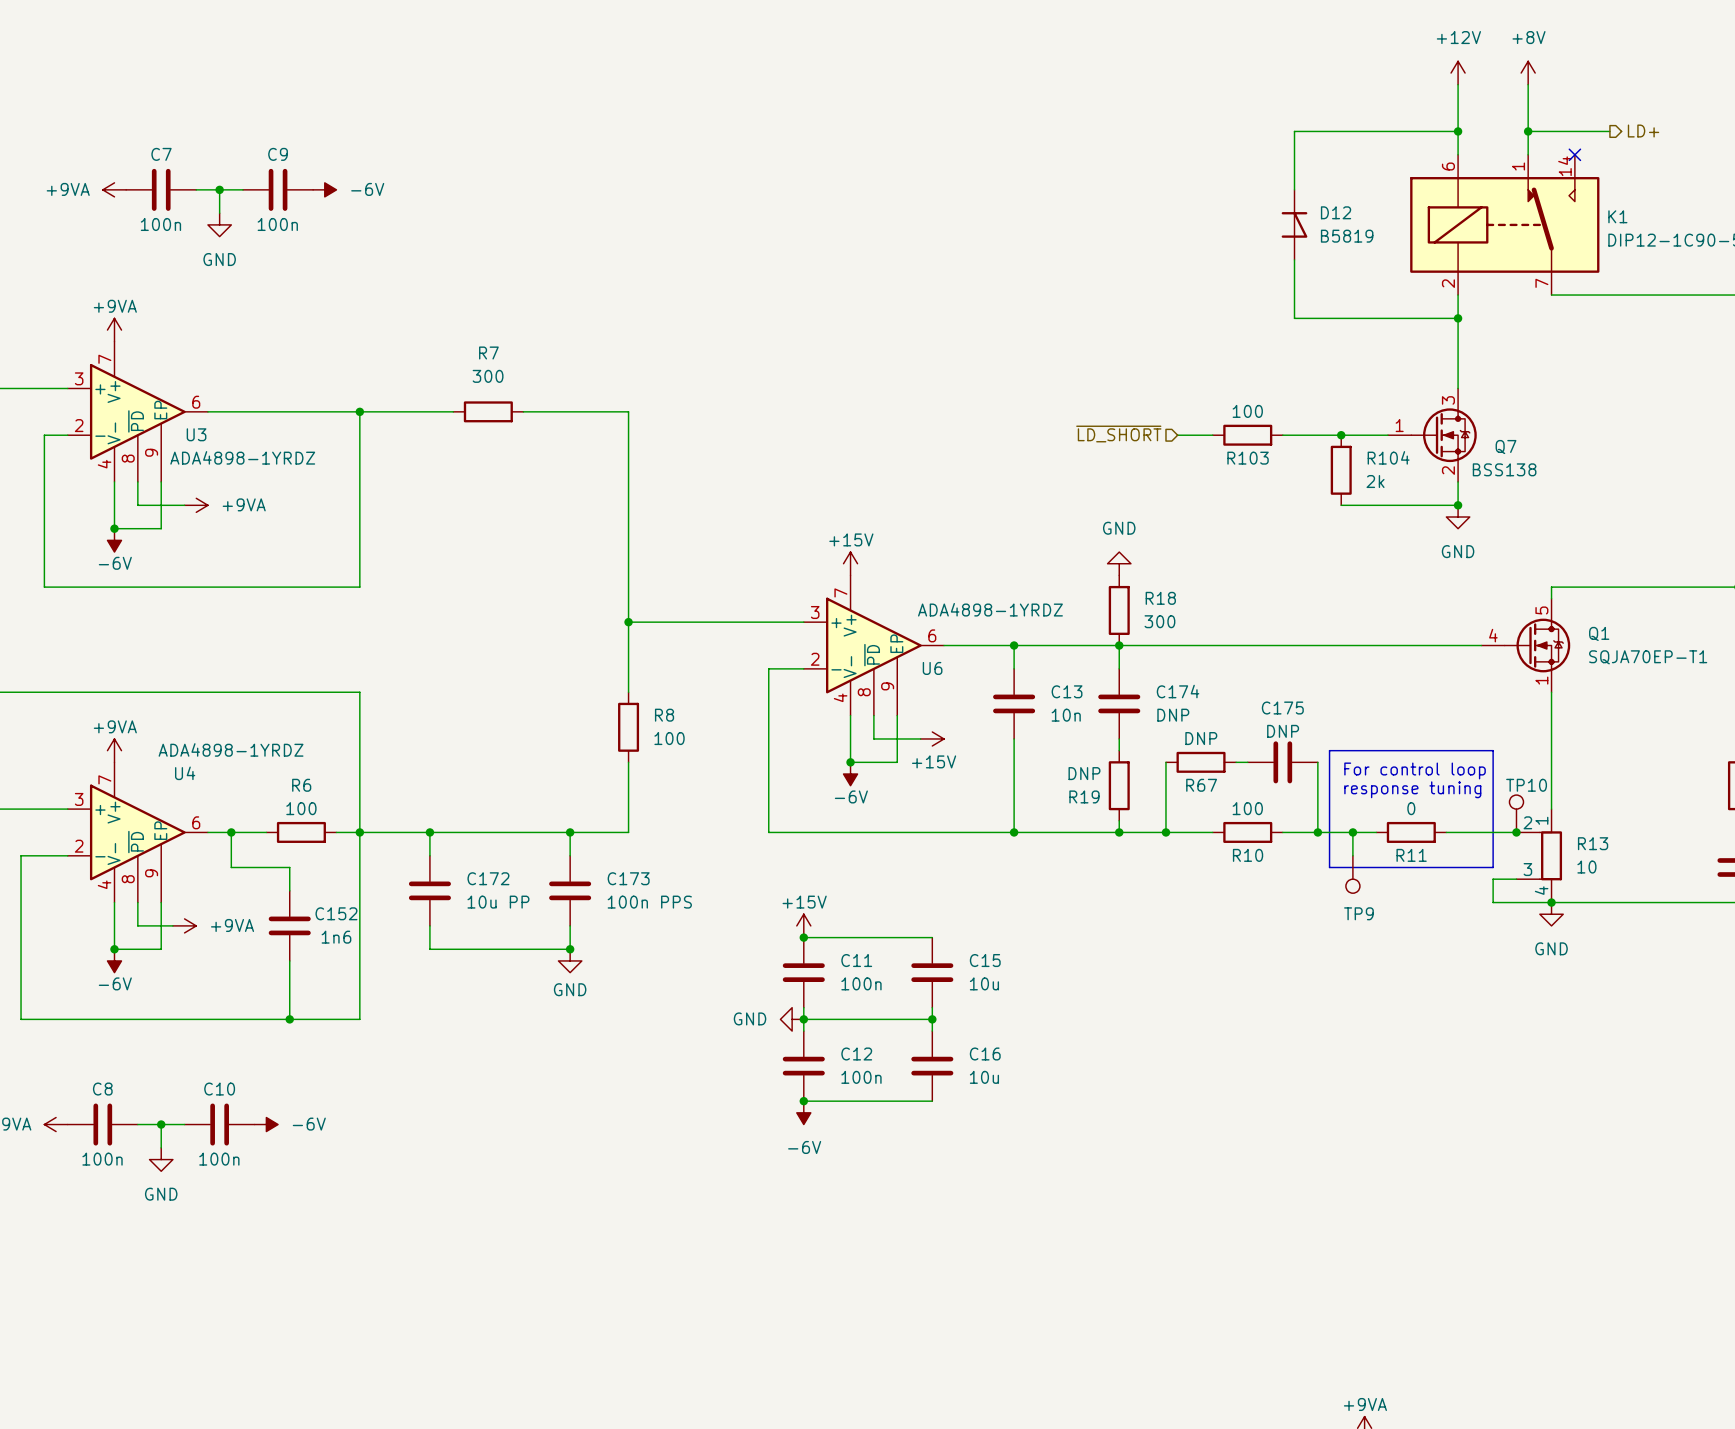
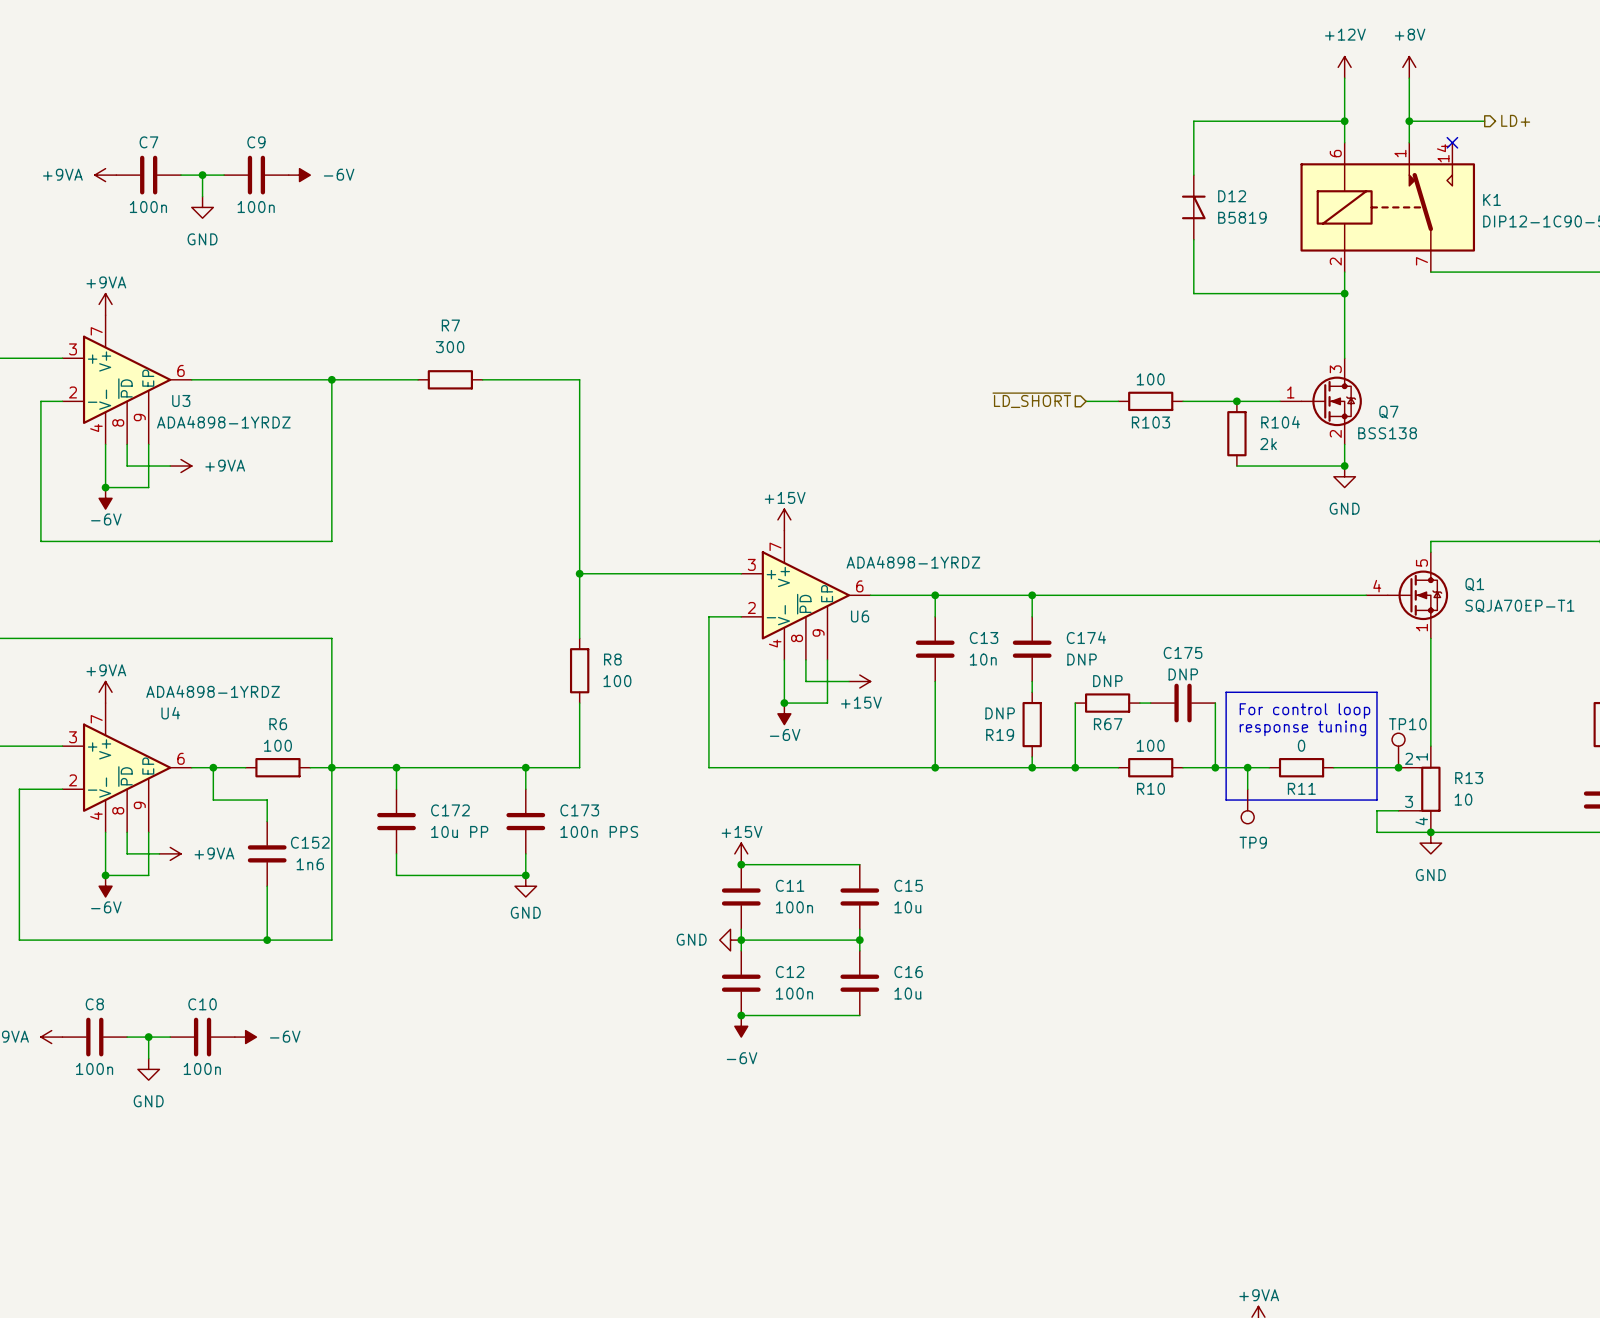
power symbol: GND (1119, 563) -> none
R18: 300 (1119, 610) -> none

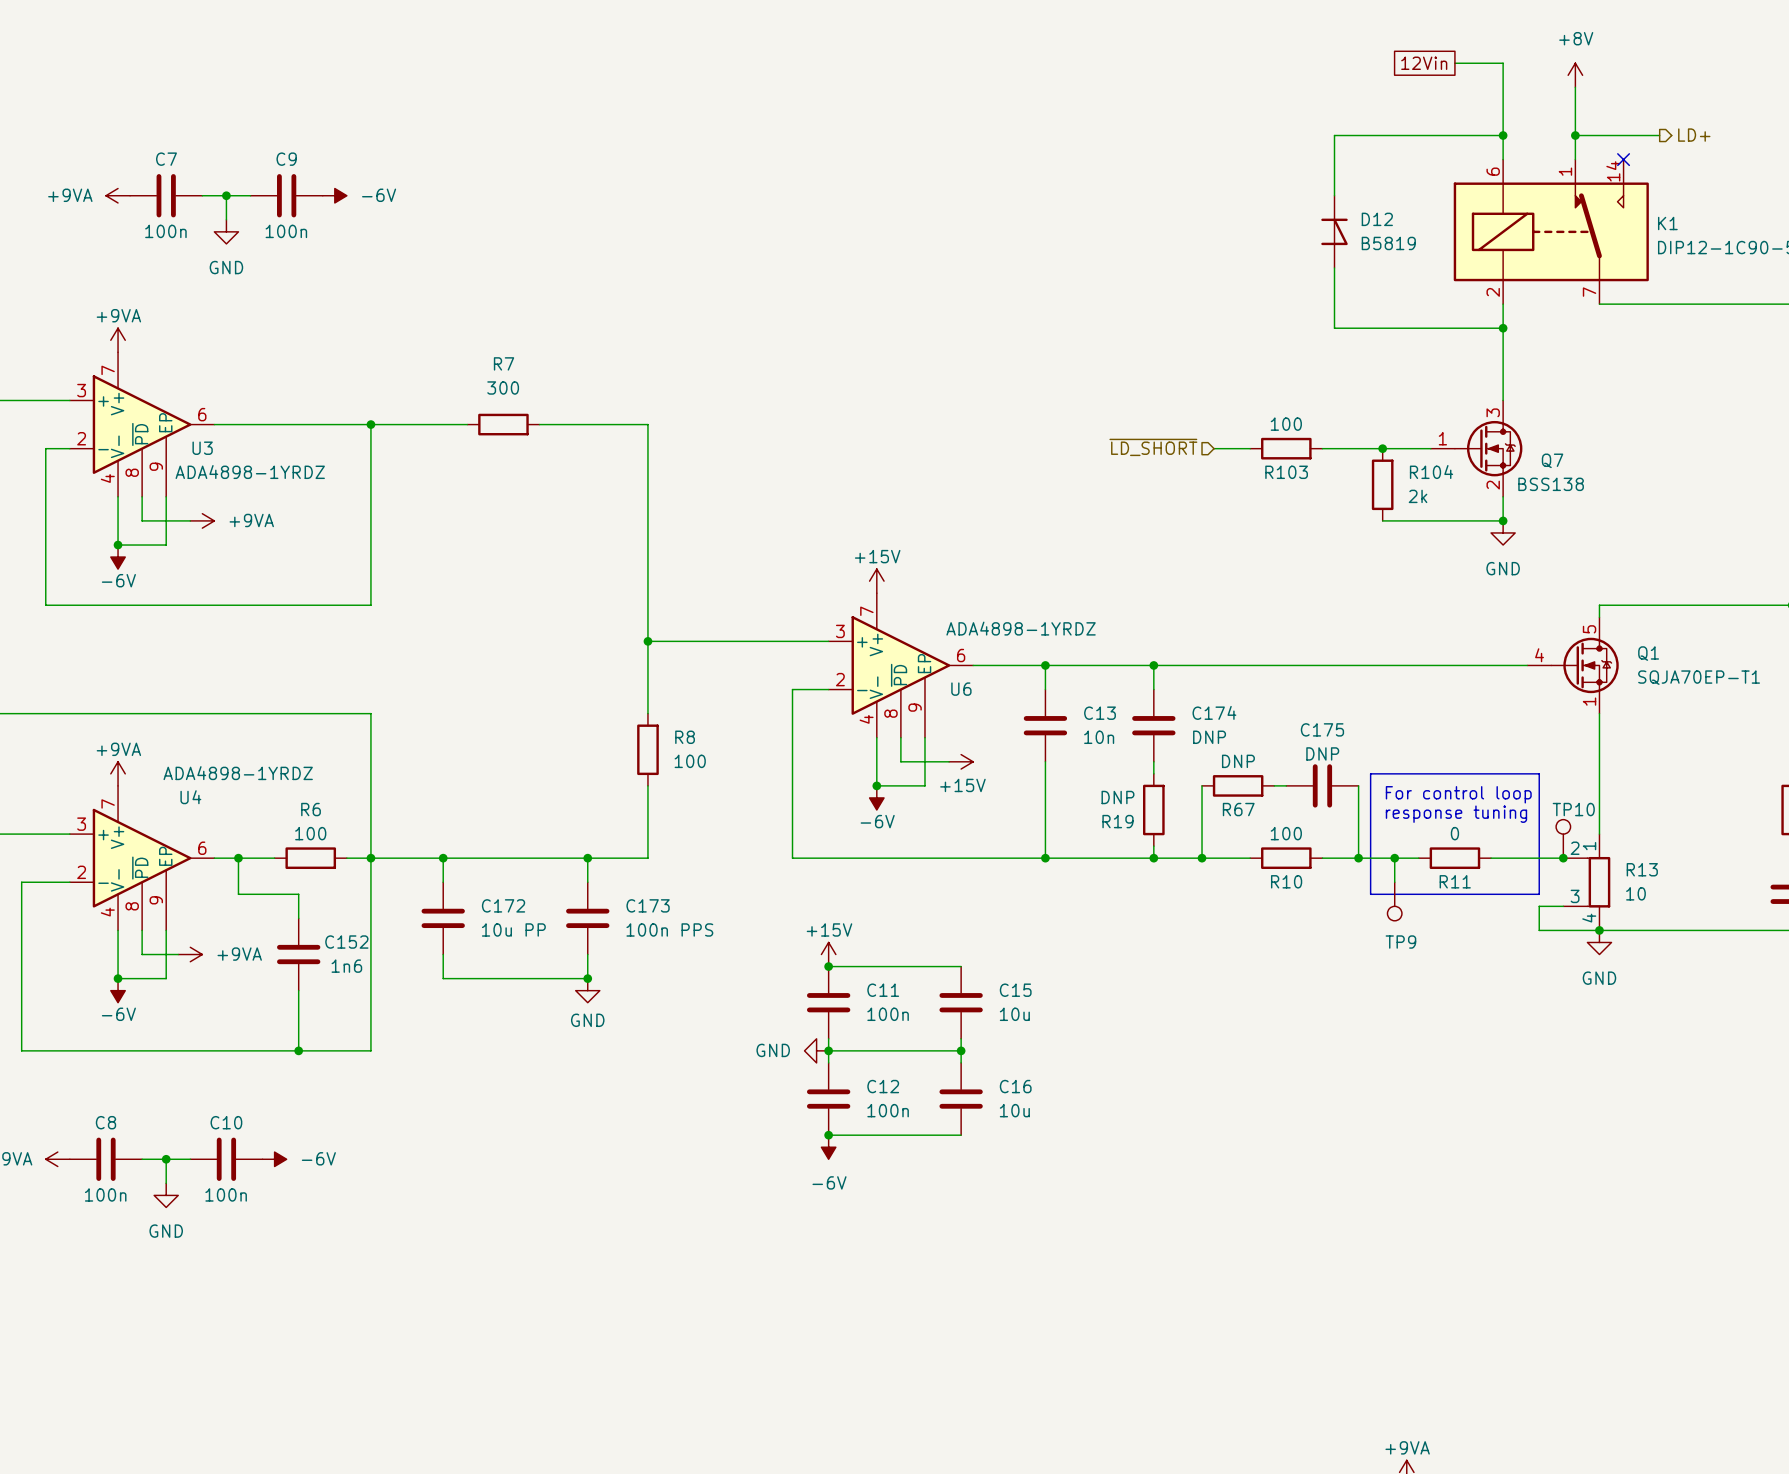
global label: none -> 12Vin (1424, 63)
wire: none -> (1454, 63) (1503, 63) (1503, 87)
power symbol: +12V (1344, 67) -> none

